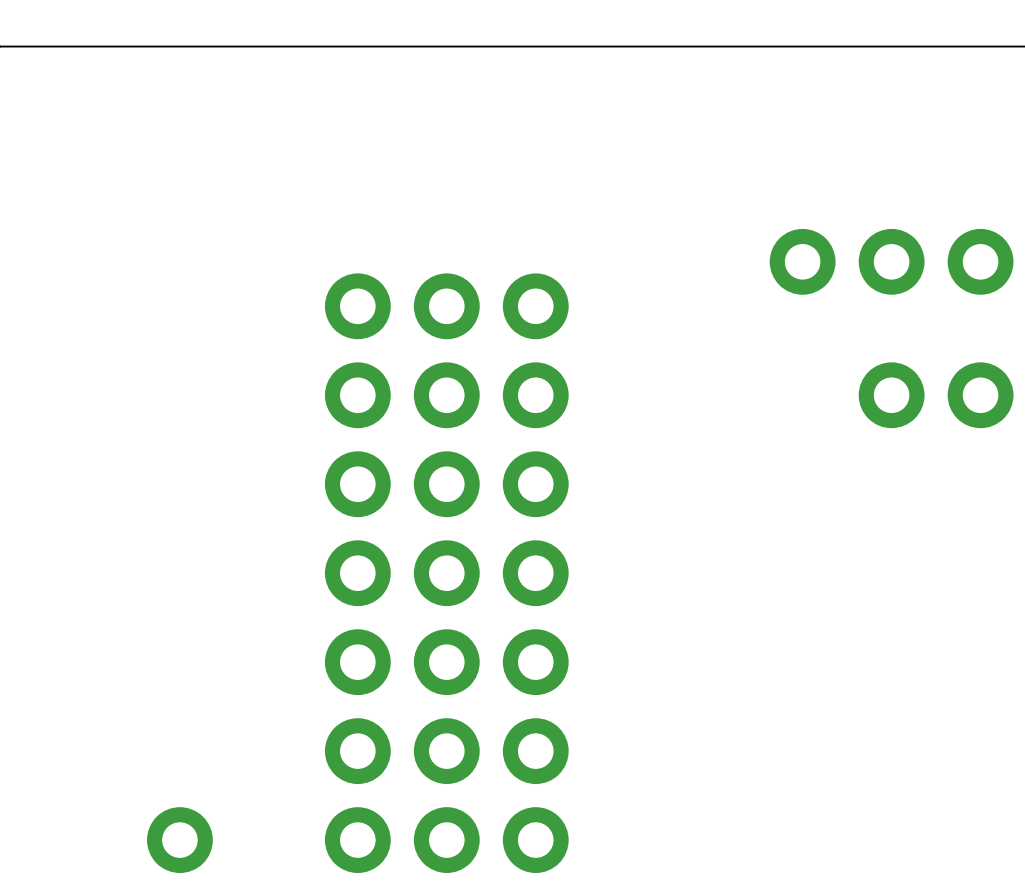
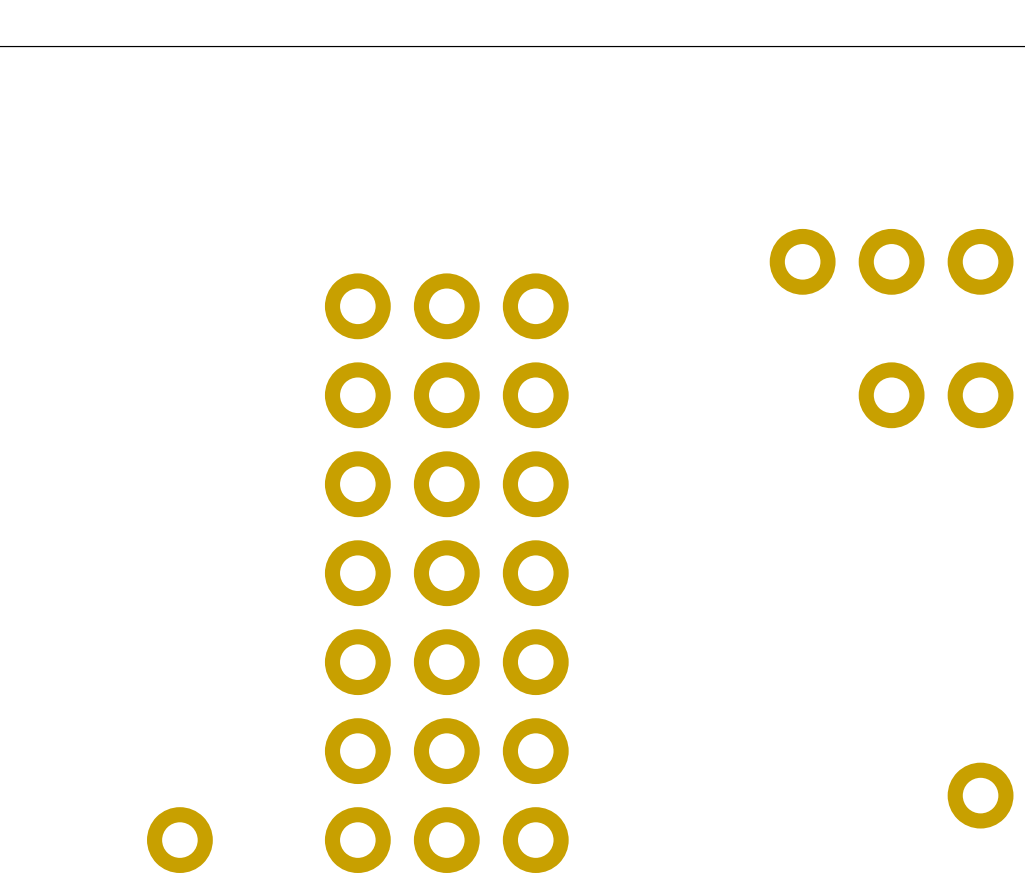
part: none -> (980, 795)

